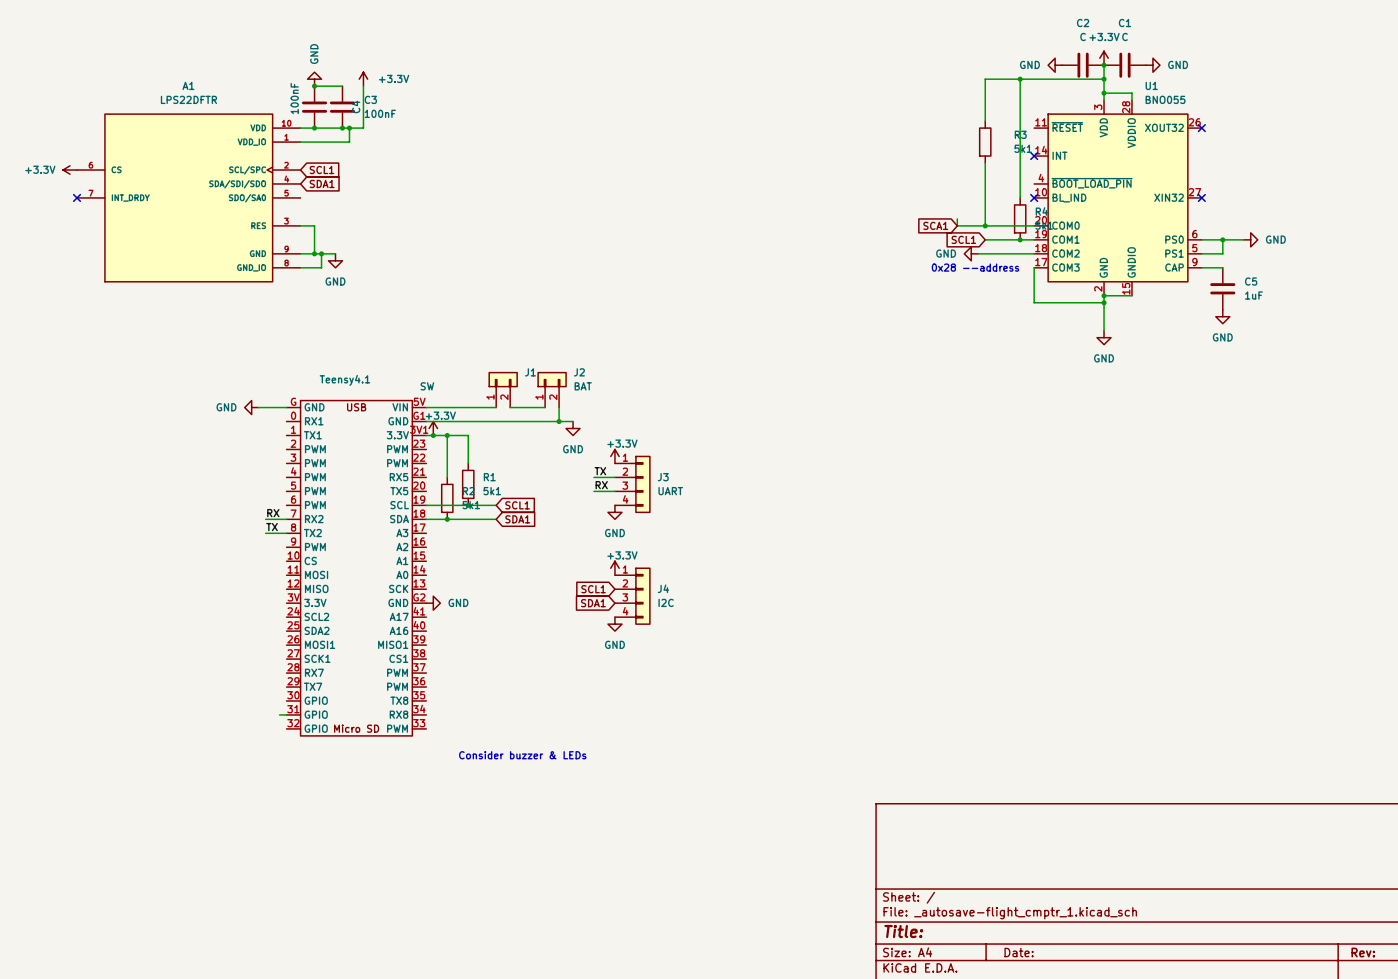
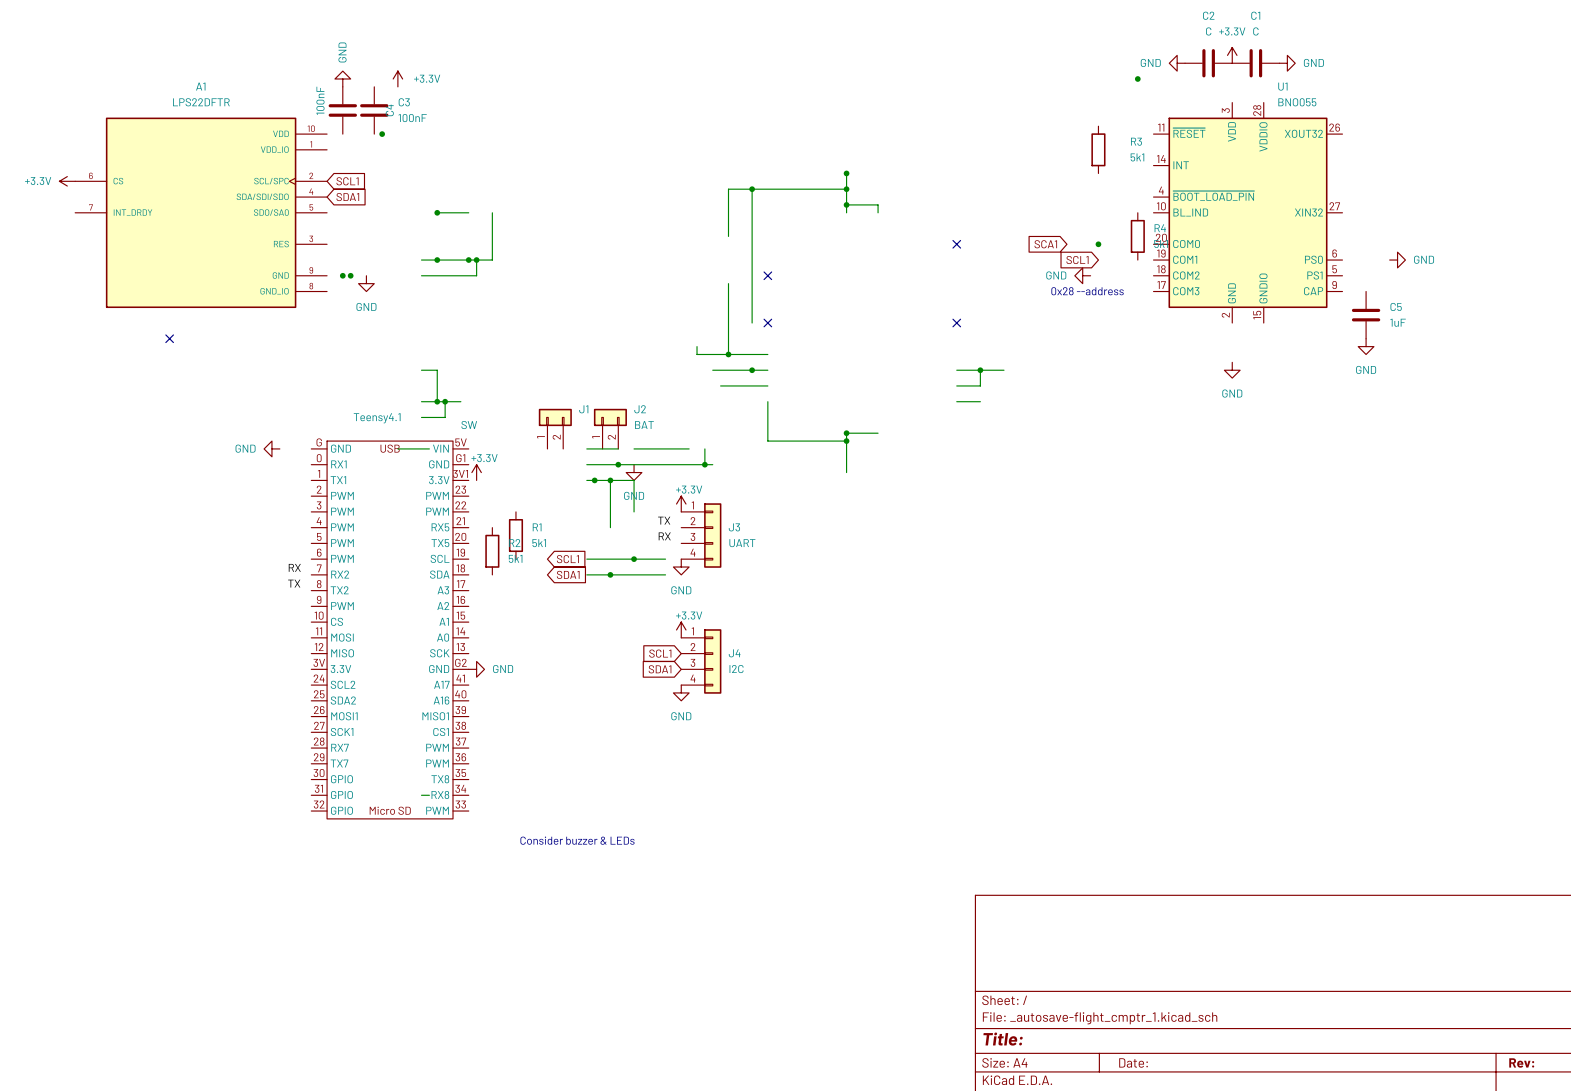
wire: (1104, 65) (1104, 100) -> none
junction: (1104, 65) -> none
wire: (1020, 79) (1020, 197) -> none
wire: (1104, 79) (985, 79) (985, 121) -> none
junction: (1104, 79) -> none
wire: (314, 86) (342, 86) -> none
junction: (314, 86) -> none
wire: (363, 86) (363, 128) (300, 128) -> none
wire: (1104, 93) (1131, 93) (1131, 100) -> none
junction: (1104, 93) -> none
junction: (314, 128) -> none
junction: (342, 128) -> none
wire: (349, 128) (349, 142) (300, 142) -> none
no-connect mark: (1201, 128) -> none
no-connect mark: (1034, 156) -> none
wire: none -> (846, 173) (846, 212)
junction: none -> (846, 173)
wire: (985, 163) (985, 225) -> none
wire: none -> (752, 189) (752, 323)
junction: none -> (752, 189)
wire: none -> (846, 189) (728, 189) (728, 236)
junction: none -> (846, 189)
wire: none -> (846, 204) (878, 204) (878, 212)
junction: none -> (846, 204)
no-connect mark: (76, 197) -> none
wire: none -> (437, 212) (468, 212)
junction: none -> (437, 212)
wire: none -> (492, 212) (492, 260) (421, 260)
no-connect mark: (1034, 197) -> none
no-connect mark: (1201, 197) -> none
wire: (957, 218) (957, 225) (1034, 225) -> none
wire: (300, 225) (314, 225) (314, 253) -> none
no-connect mark: none -> (956, 244)
junction: none -> (437, 260)
junction: none -> (468, 260)
wire: none -> (476, 260) (476, 275) (421, 275)
junction: none -> (476, 260)
wire: (985, 239) (1034, 239) -> none
junction: (1020, 239) -> none
wire: (1201, 239) (1243, 239) -> none
wire: (1222, 239) (1222, 253) (1201, 253) -> none
junction: (1222, 239) -> none
wire: (300, 253) (335, 253) -> none
wire: (321, 253) (321, 267) (300, 267) -> none
no-connect mark: none -> (767, 275)
wire: (978, 253) (1034, 253) -> none
wire: none -> (728, 283) (728, 354)
wire: (1034, 267) (1034, 302) (1104, 302) -> none
wire: (1201, 267) (1222, 267) -> none
no-connect mark: none -> (767, 323)
no-connect mark: none -> (956, 323)
junction: (1104, 295) -> none
wire: (1131, 295) (1104, 295) (1104, 330) -> none
junction: (1104, 302) -> none
no-connect mark: none -> (169, 338)
wire: none -> (697, 346) (697, 354) (767, 354)
junction: none -> (728, 354)
wire: none -> (421, 370) (437, 370) (437, 401)
wire: none -> (712, 370) (767, 370)
junction: none -> (752, 370)
wire: none -> (956, 370) (1003, 370)
wire: none -> (980, 370) (980, 385) (956, 385)
junction: none -> (980, 370)
wire: none -> (720, 385) (767, 385)
wire: none -> (421, 401) (460, 401)
junction: none -> (437, 401)
wire: none -> (445, 401) (445, 417) (421, 417)
junction: none -> (445, 401)
wire: none -> (767, 401) (767, 441) (846, 441)
wire: none -> (956, 401) (980, 401)
junction: none -> (846, 433)
wire: none -> (878, 433) (846, 433) (846, 472)
junction: none -> (846, 441)
wire: (258, 407) (286, 407) -> (397, 448) (429, 448)
wire: (426, 407) (496, 407) -> none
wire: (510, 407) (531, 407) -> none
wire: (559, 407) (559, 421) -> (618, 448) (602, 448)
wire: none -> (634, 448) (689, 448)
wire: none -> (704, 448) (704, 464)
wire: (426, 421) (531, 421) -> none
wire: none -> (634, 464) (712, 464)
junction: none -> (704, 464)
wire: (426, 435) (468, 435) (468, 463) -> (586, 480) (634, 480) (634, 511)
junction: (433, 435) -> none
wire: (447, 435) (447, 477) -> (610, 480) (610, 527)
junction: (447, 435) -> none
junction: none -> (594, 480)
junction: none -> (610, 480)
wire: (594, 477) (614, 477) -> none
wire: (594, 491) (614, 491) -> none
wire: (426, 505) (496, 505) -> (586, 559) (665, 559)
junction: (468, 505) -> none
junction: none -> (634, 559)
wire: (265, 519) (286, 519) -> none
wire: (426, 519) (496, 519) -> (586, 574) (665, 574)
junction: (447, 519) -> none
junction: none -> (610, 574)
wire: (265, 533) (286, 533) -> none
wire: (279, 714) (286, 714) -> (421, 795) (429, 795)

